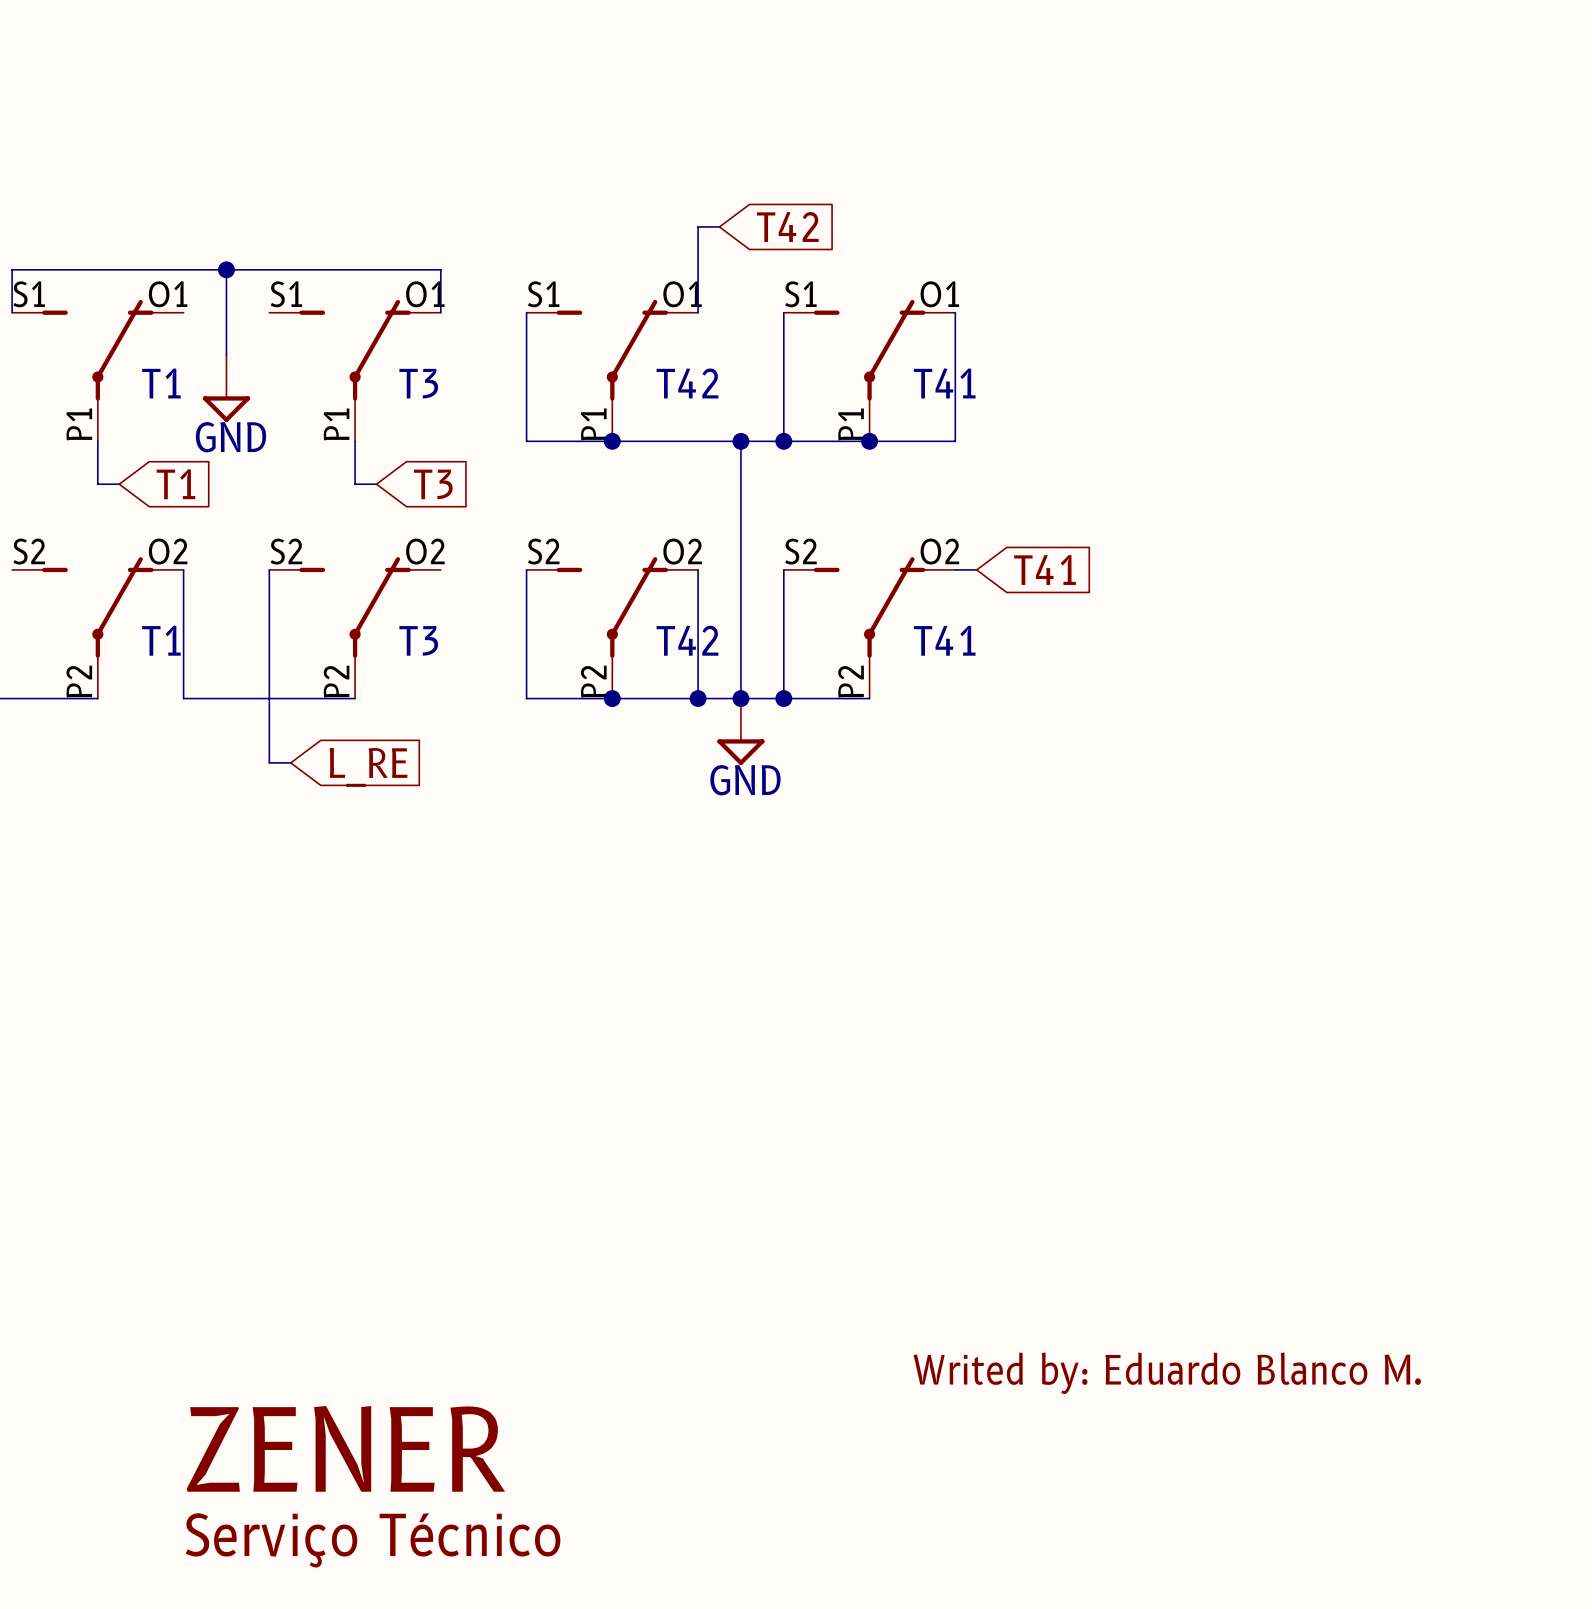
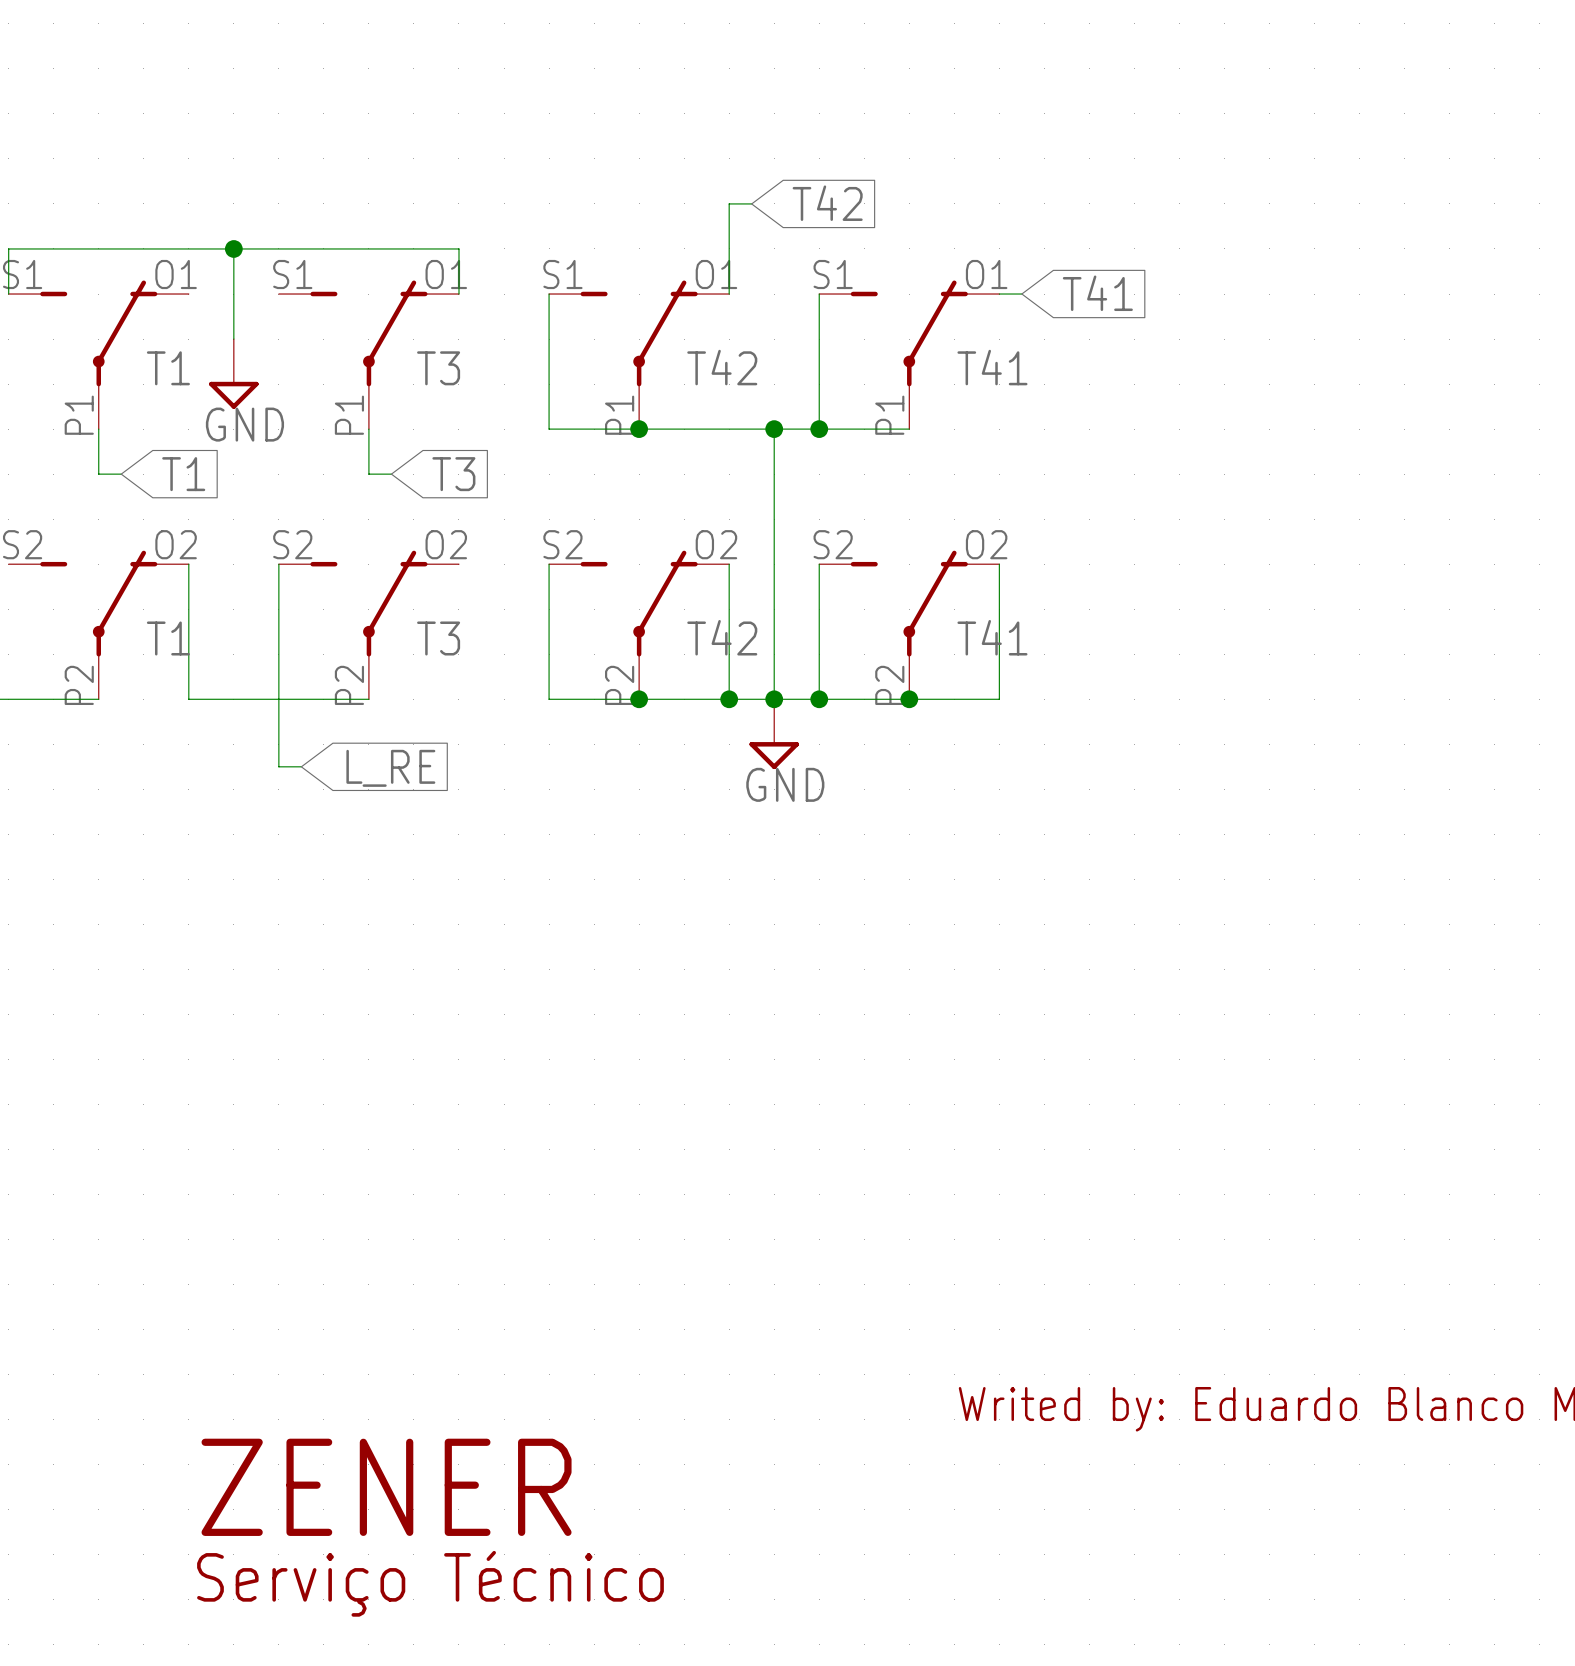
wire: (955, 312) (955, 441) (869, 441) -> (999, 294) (1021, 294)
junction: (869, 441) -> none
wire: (955, 569) (976, 569) -> (999, 564) (999, 699) (909, 699)
global label position: T41 (1045, 569) -> T41 (1097, 293)
junction: none -> (909, 699)

